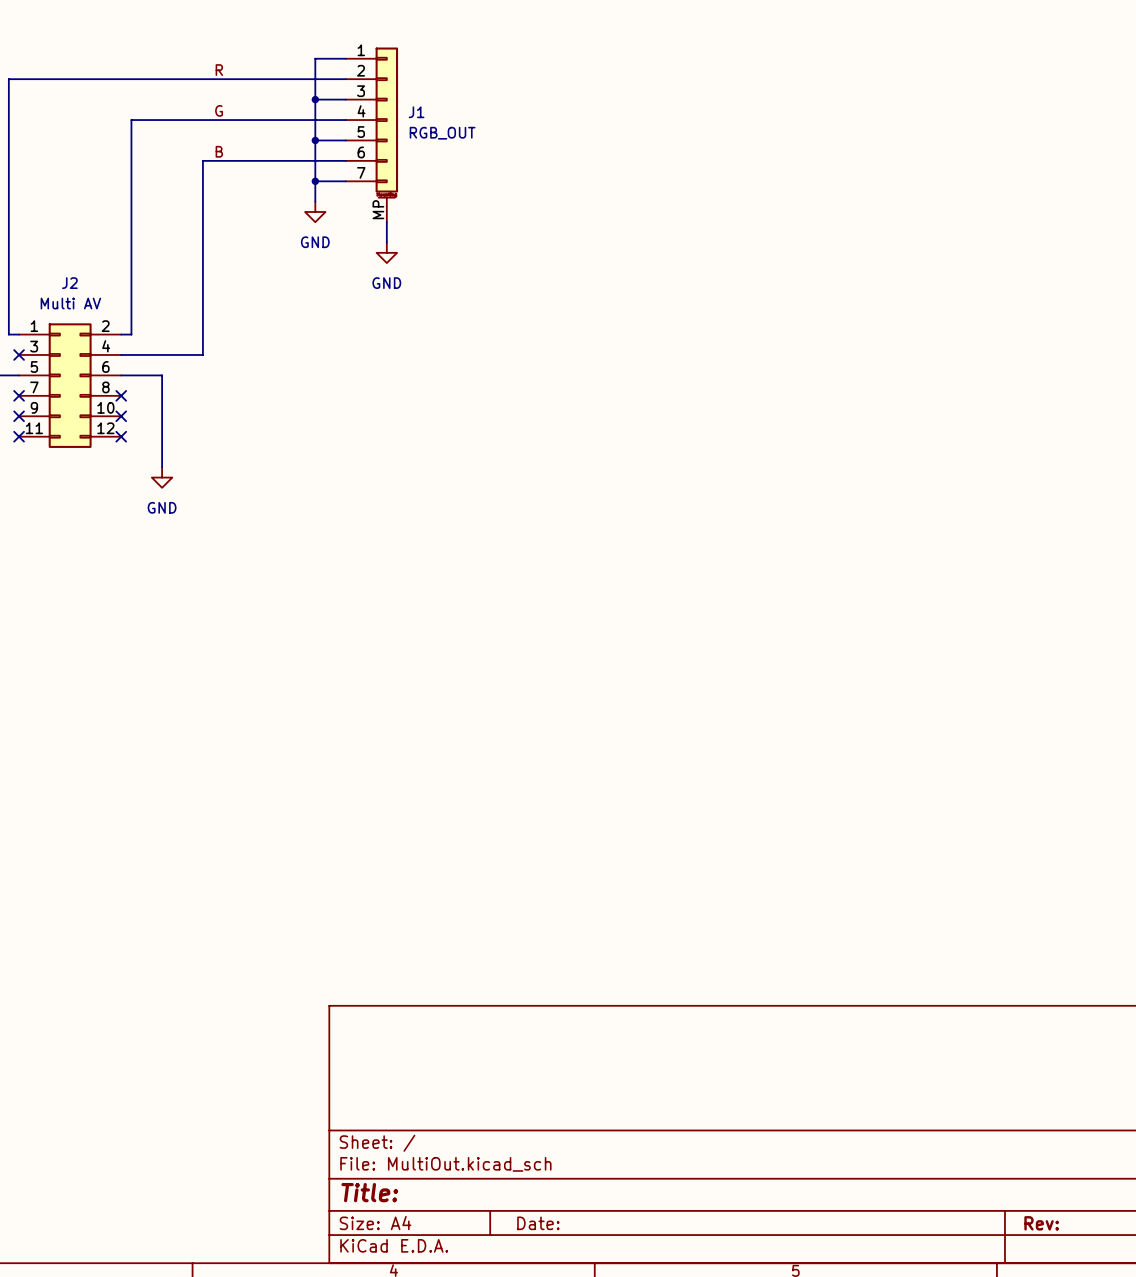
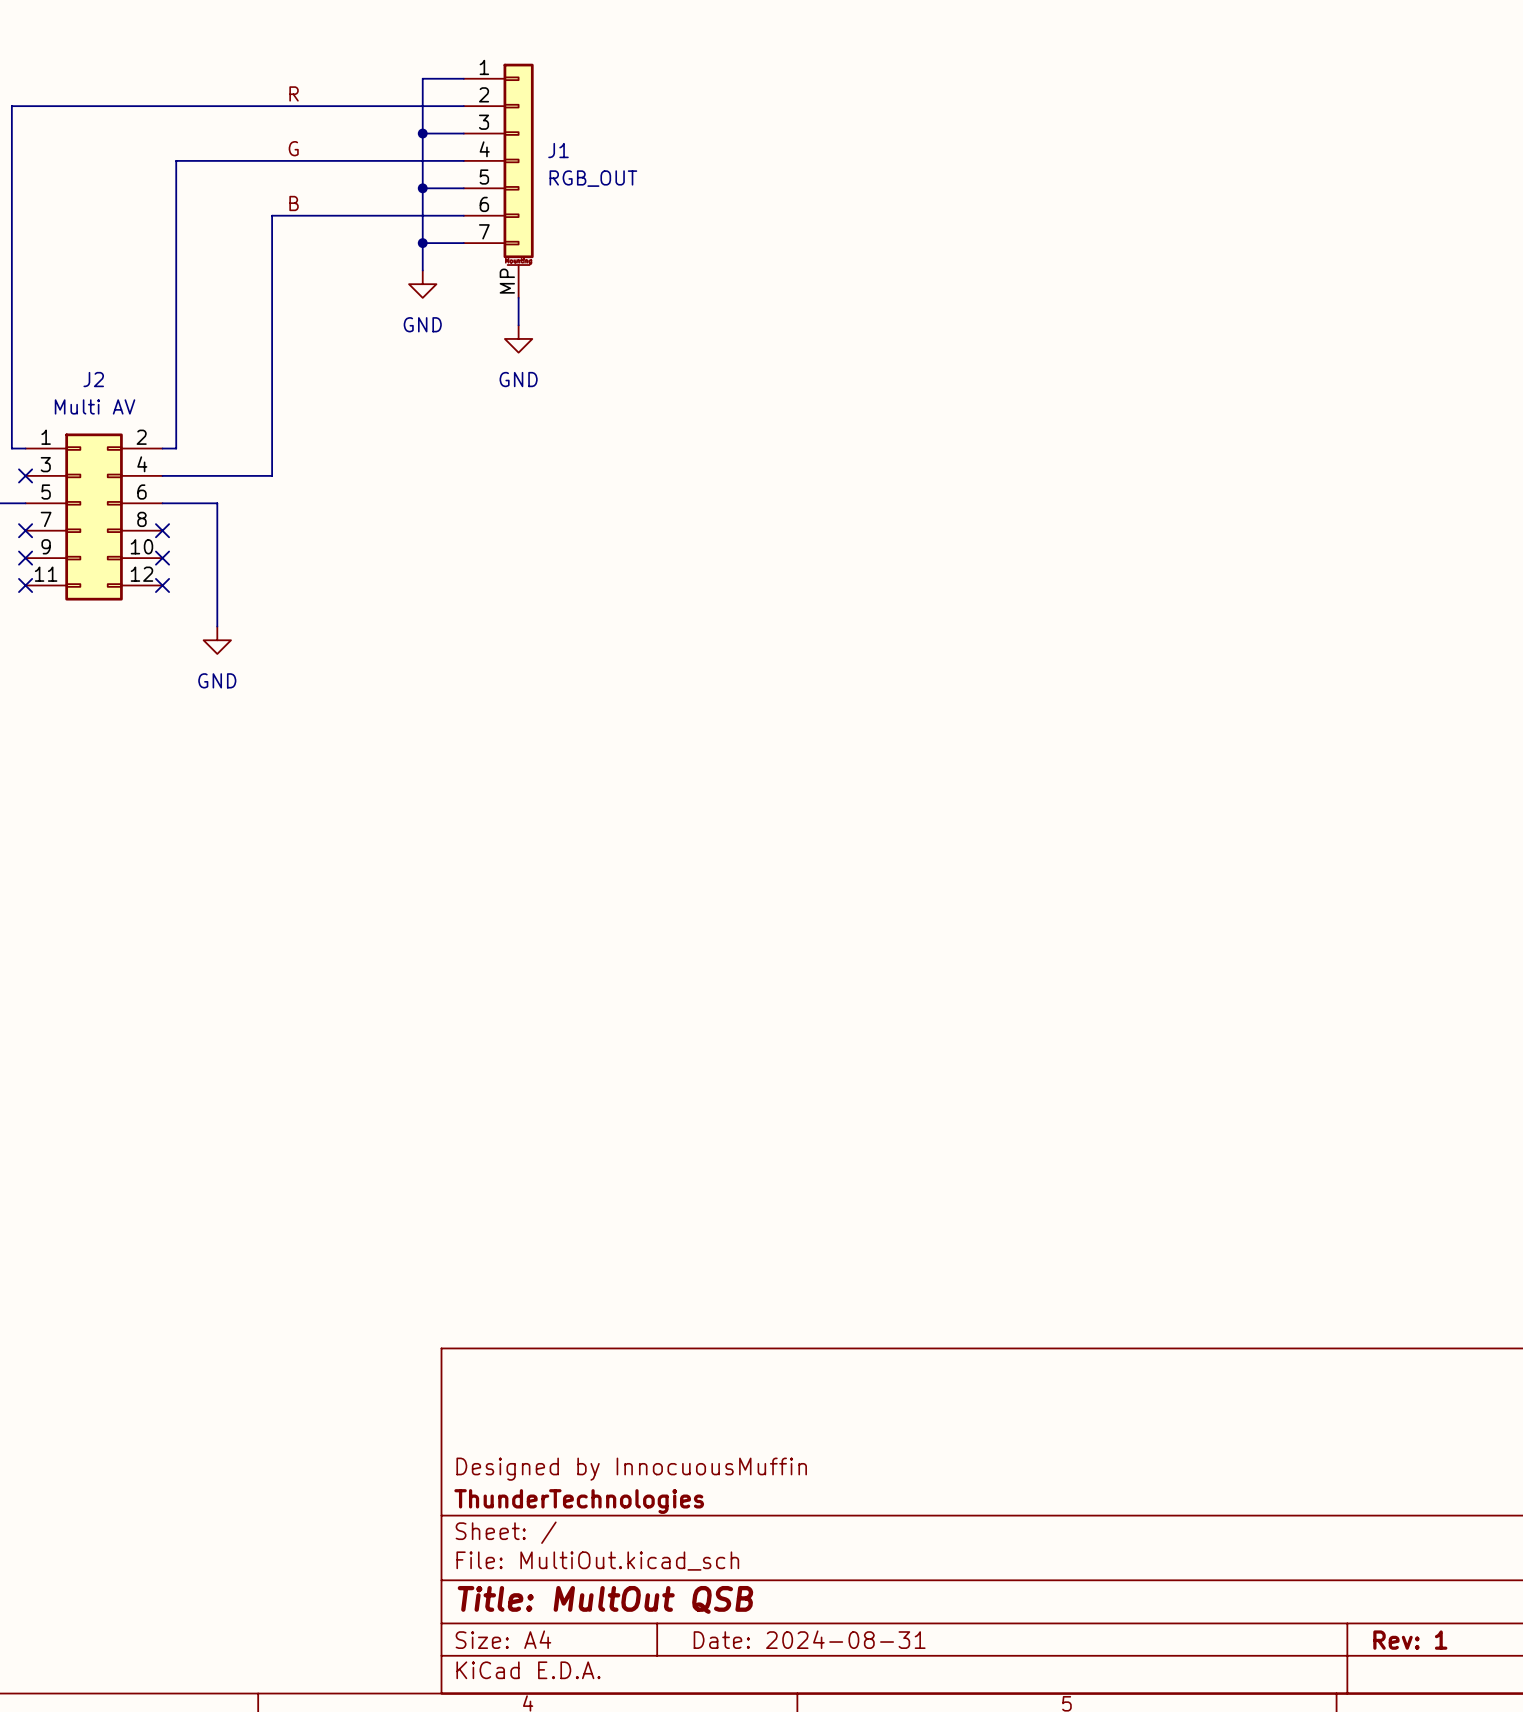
title block: none -> Designed by InnocuousMuffin (631, 1469)
title block: none -> ThunderTechnologies (579, 1501)
title block: Title: (369, 1192) -> Title: MultOut QSB (605, 1599)
title block: Date: (538, 1223) -> Date: 2024-08-31 (809, 1639)
title block: Rev: (1041, 1223) -> Rev: 1 (1410, 1640)

